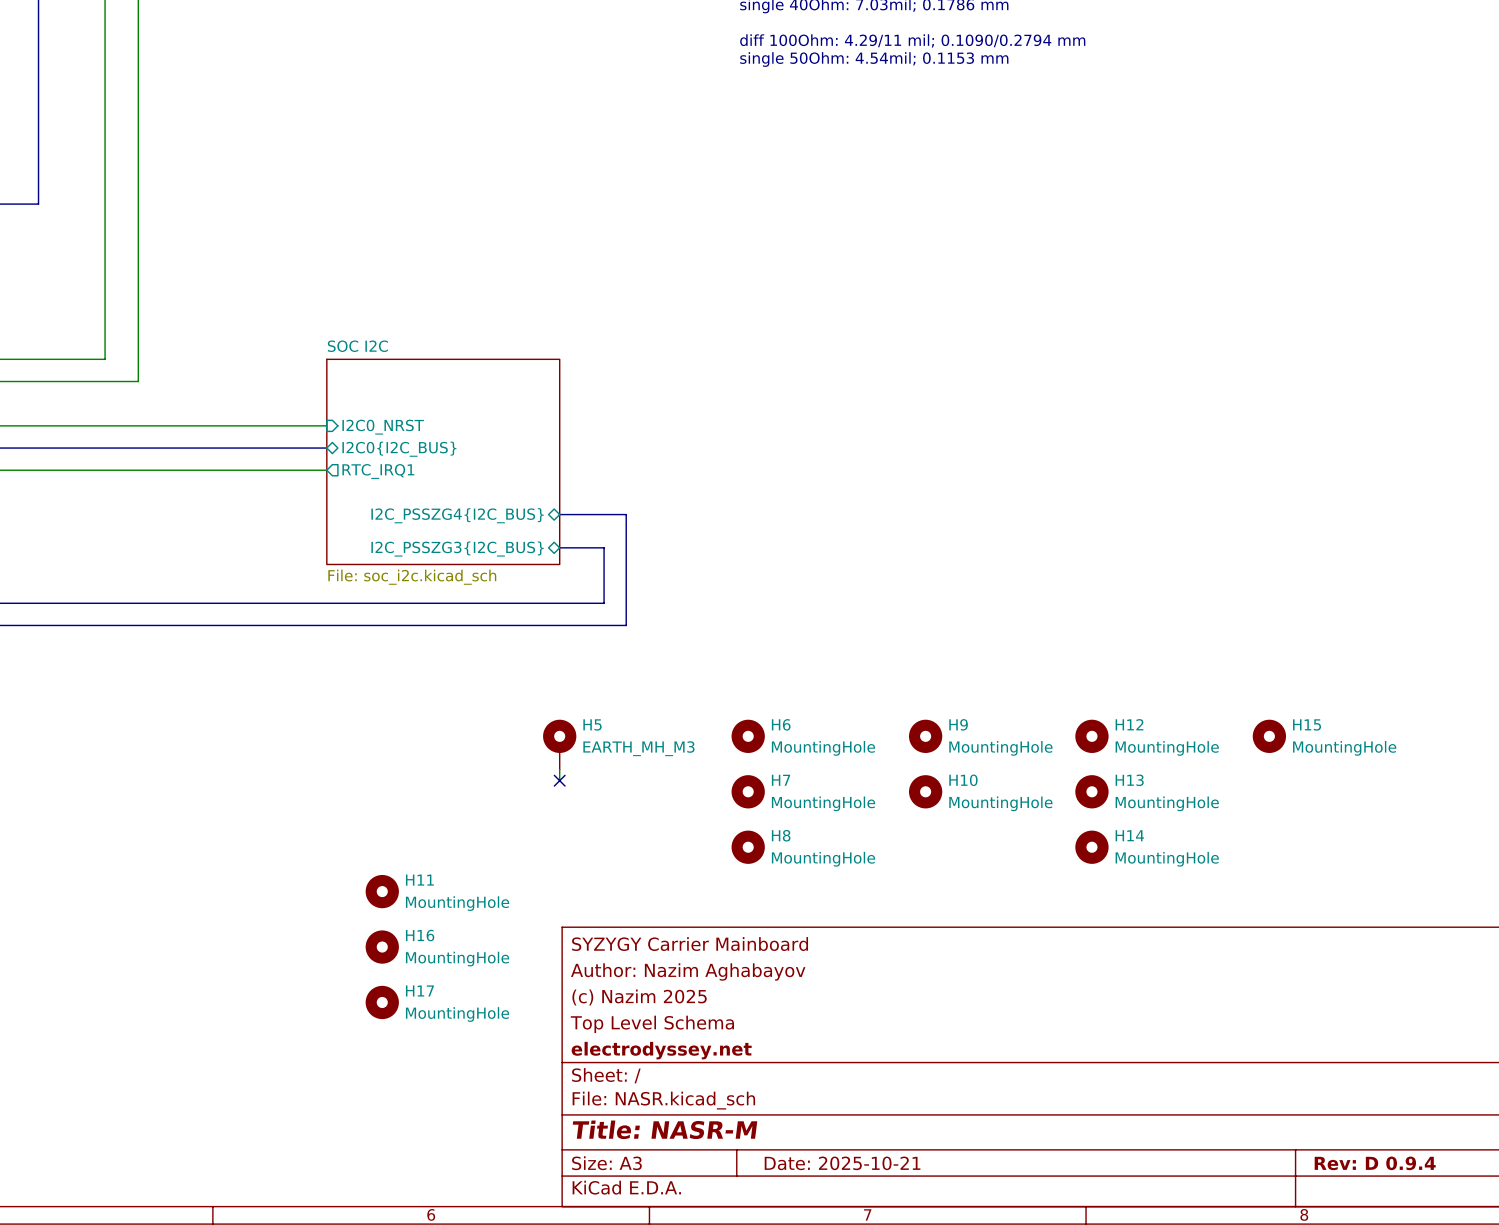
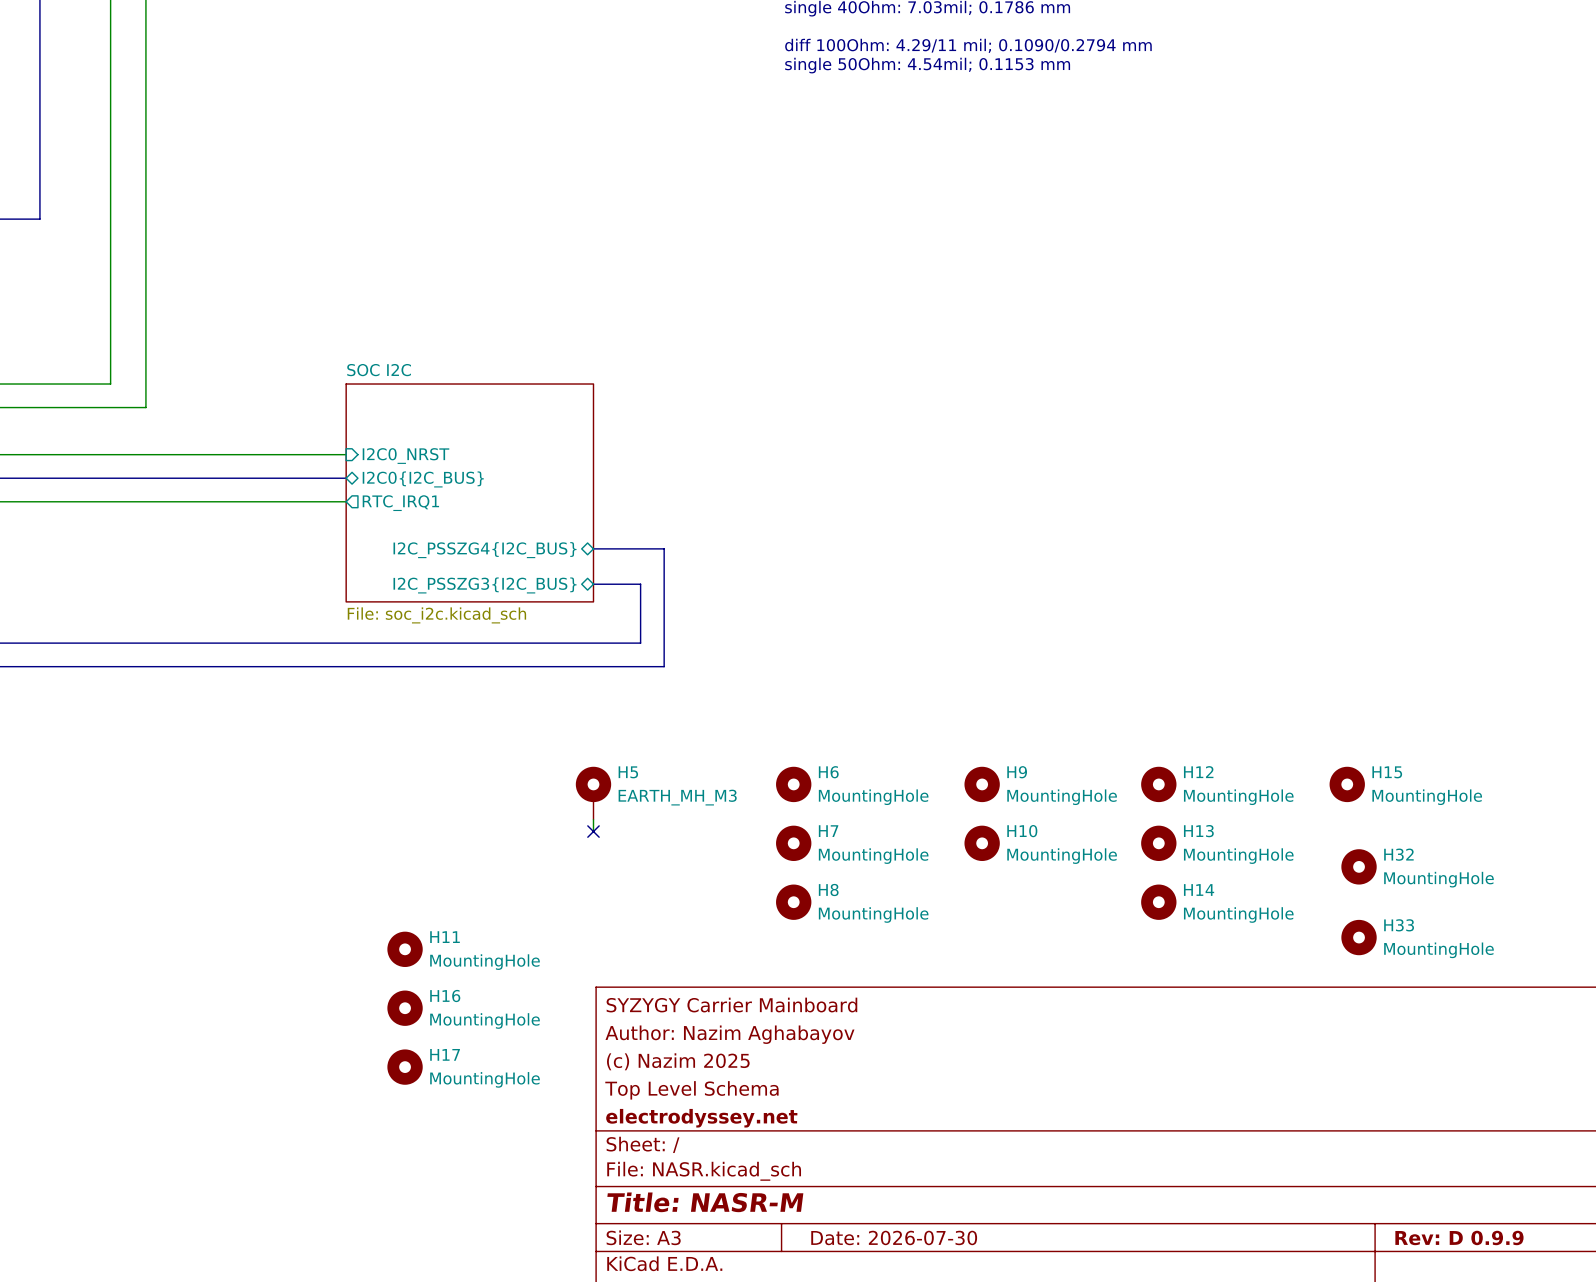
H32: none -> MountingHole (1359, 866)
H33: none -> MountingHole (1359, 937)
title block: Date: 2025-10-21 (842, 1163) -> Date: 2026-07-30 (894, 1237)
title block: Rev: D 0.9.4 (1375, 1163) -> Rev: D 0.9.9 (1459, 1237)

